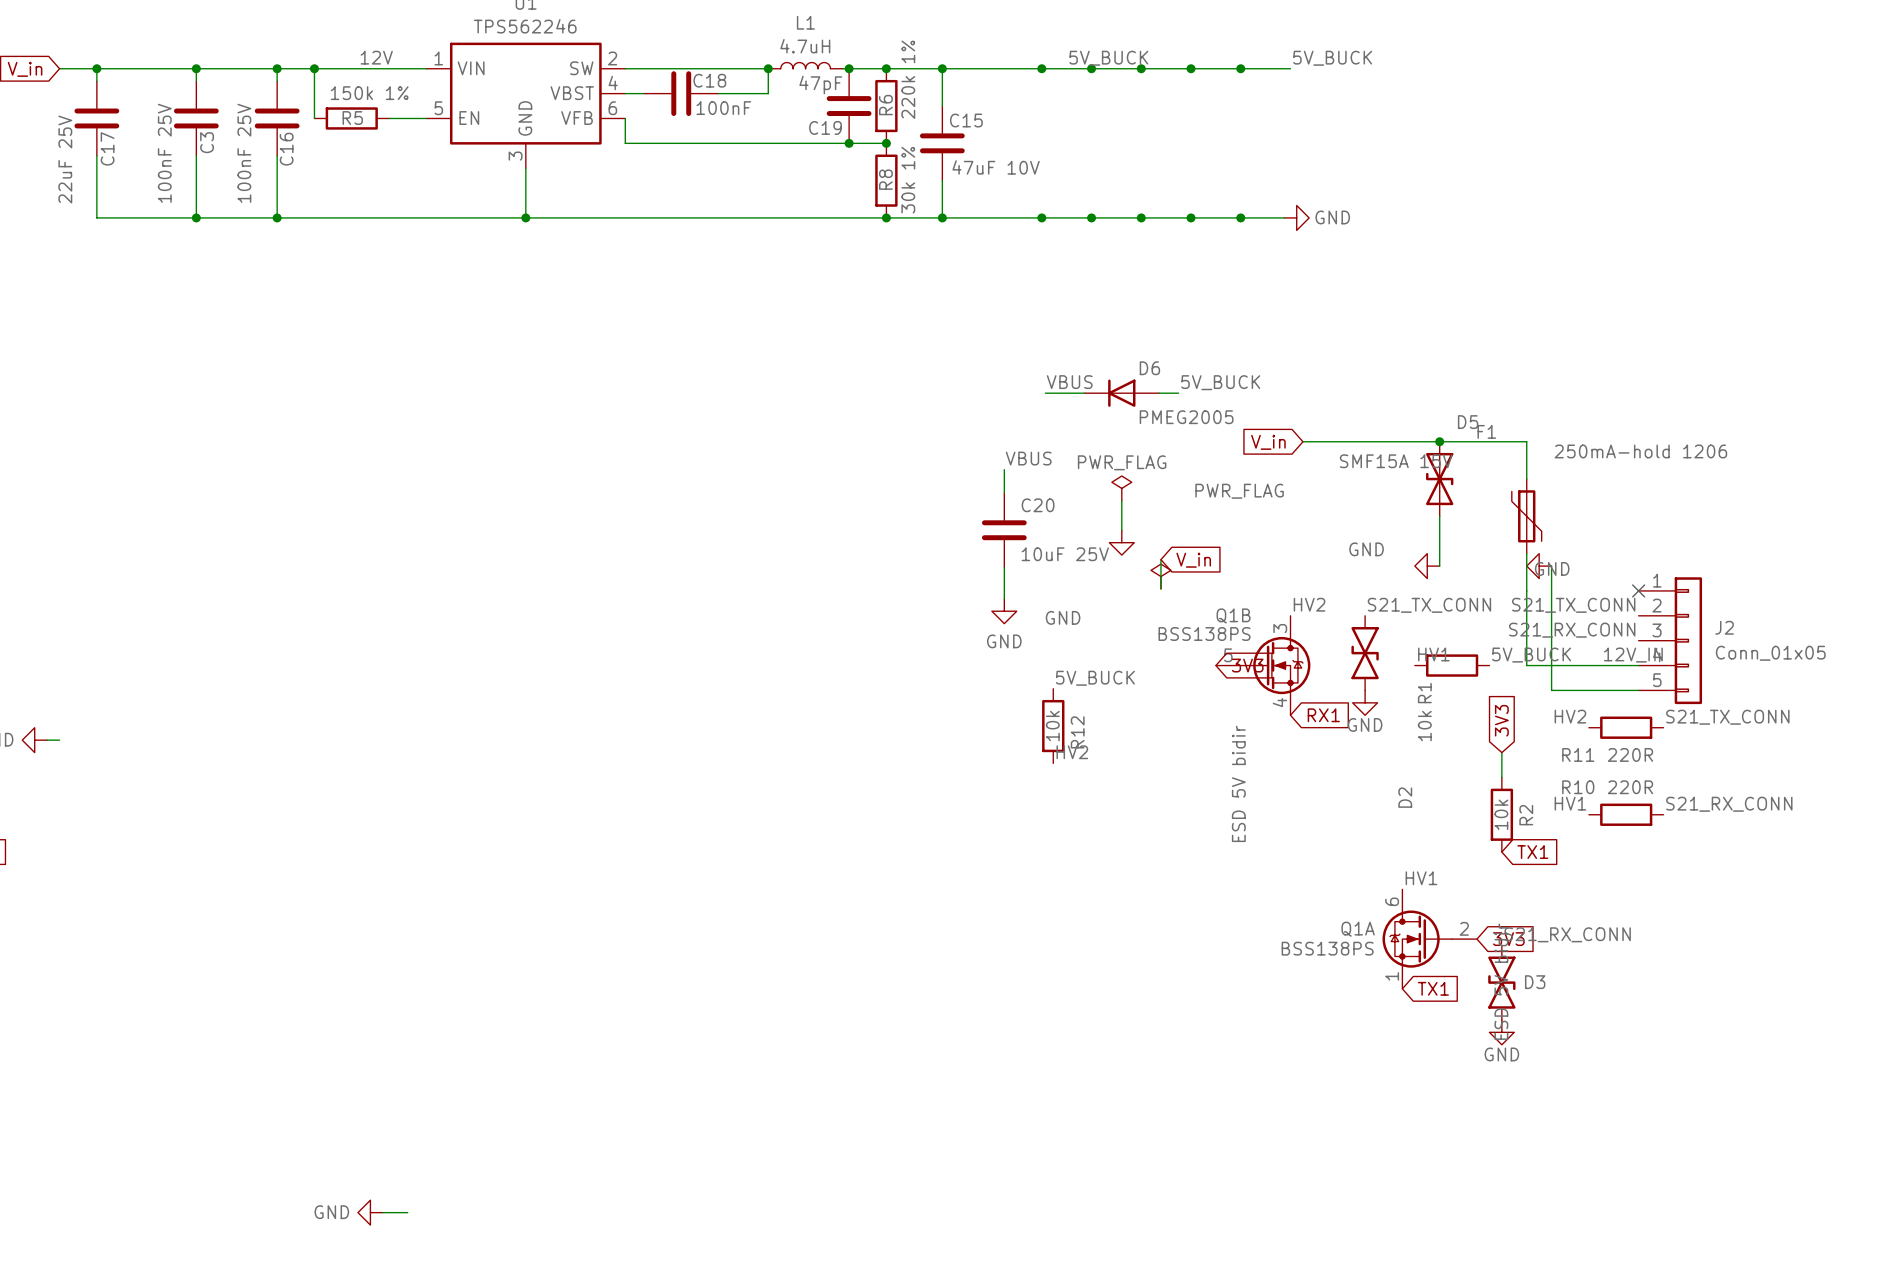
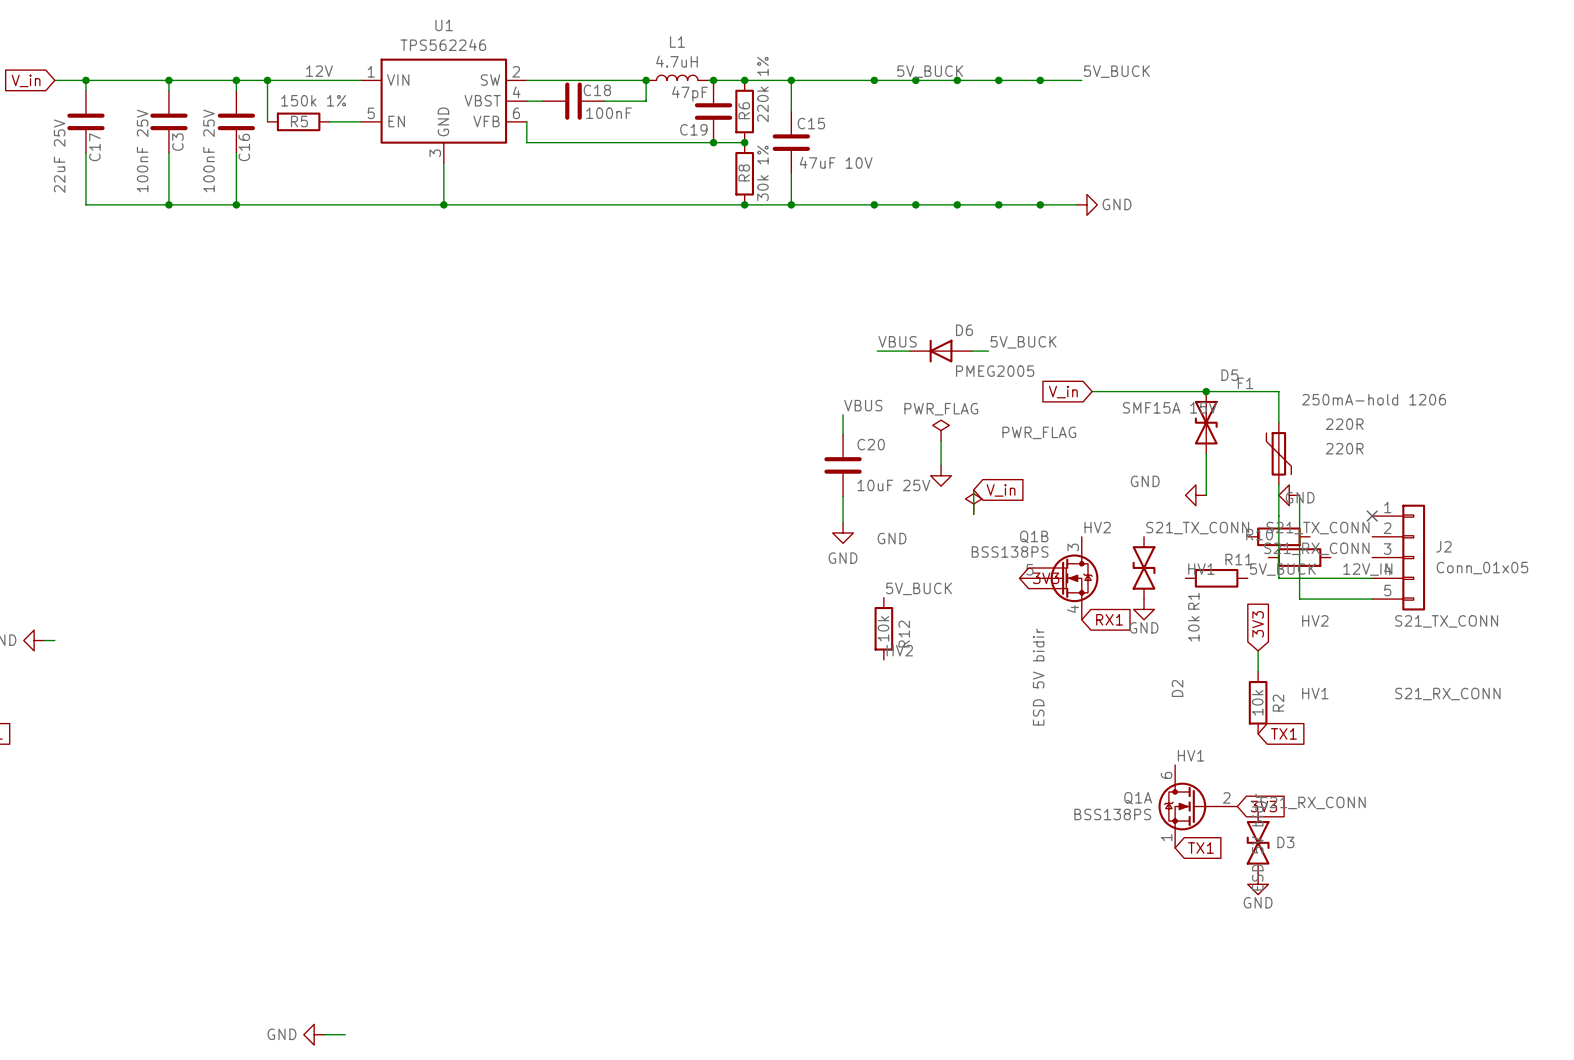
R11 position: (1626, 727) -> (1278, 536)
R11 value position: 220R (1630, 754) -> 220R (1344, 424)
R10 value position: 220R (1630, 787) -> 220R (1344, 448)
R10 position: (1626, 814) -> (1299, 557)

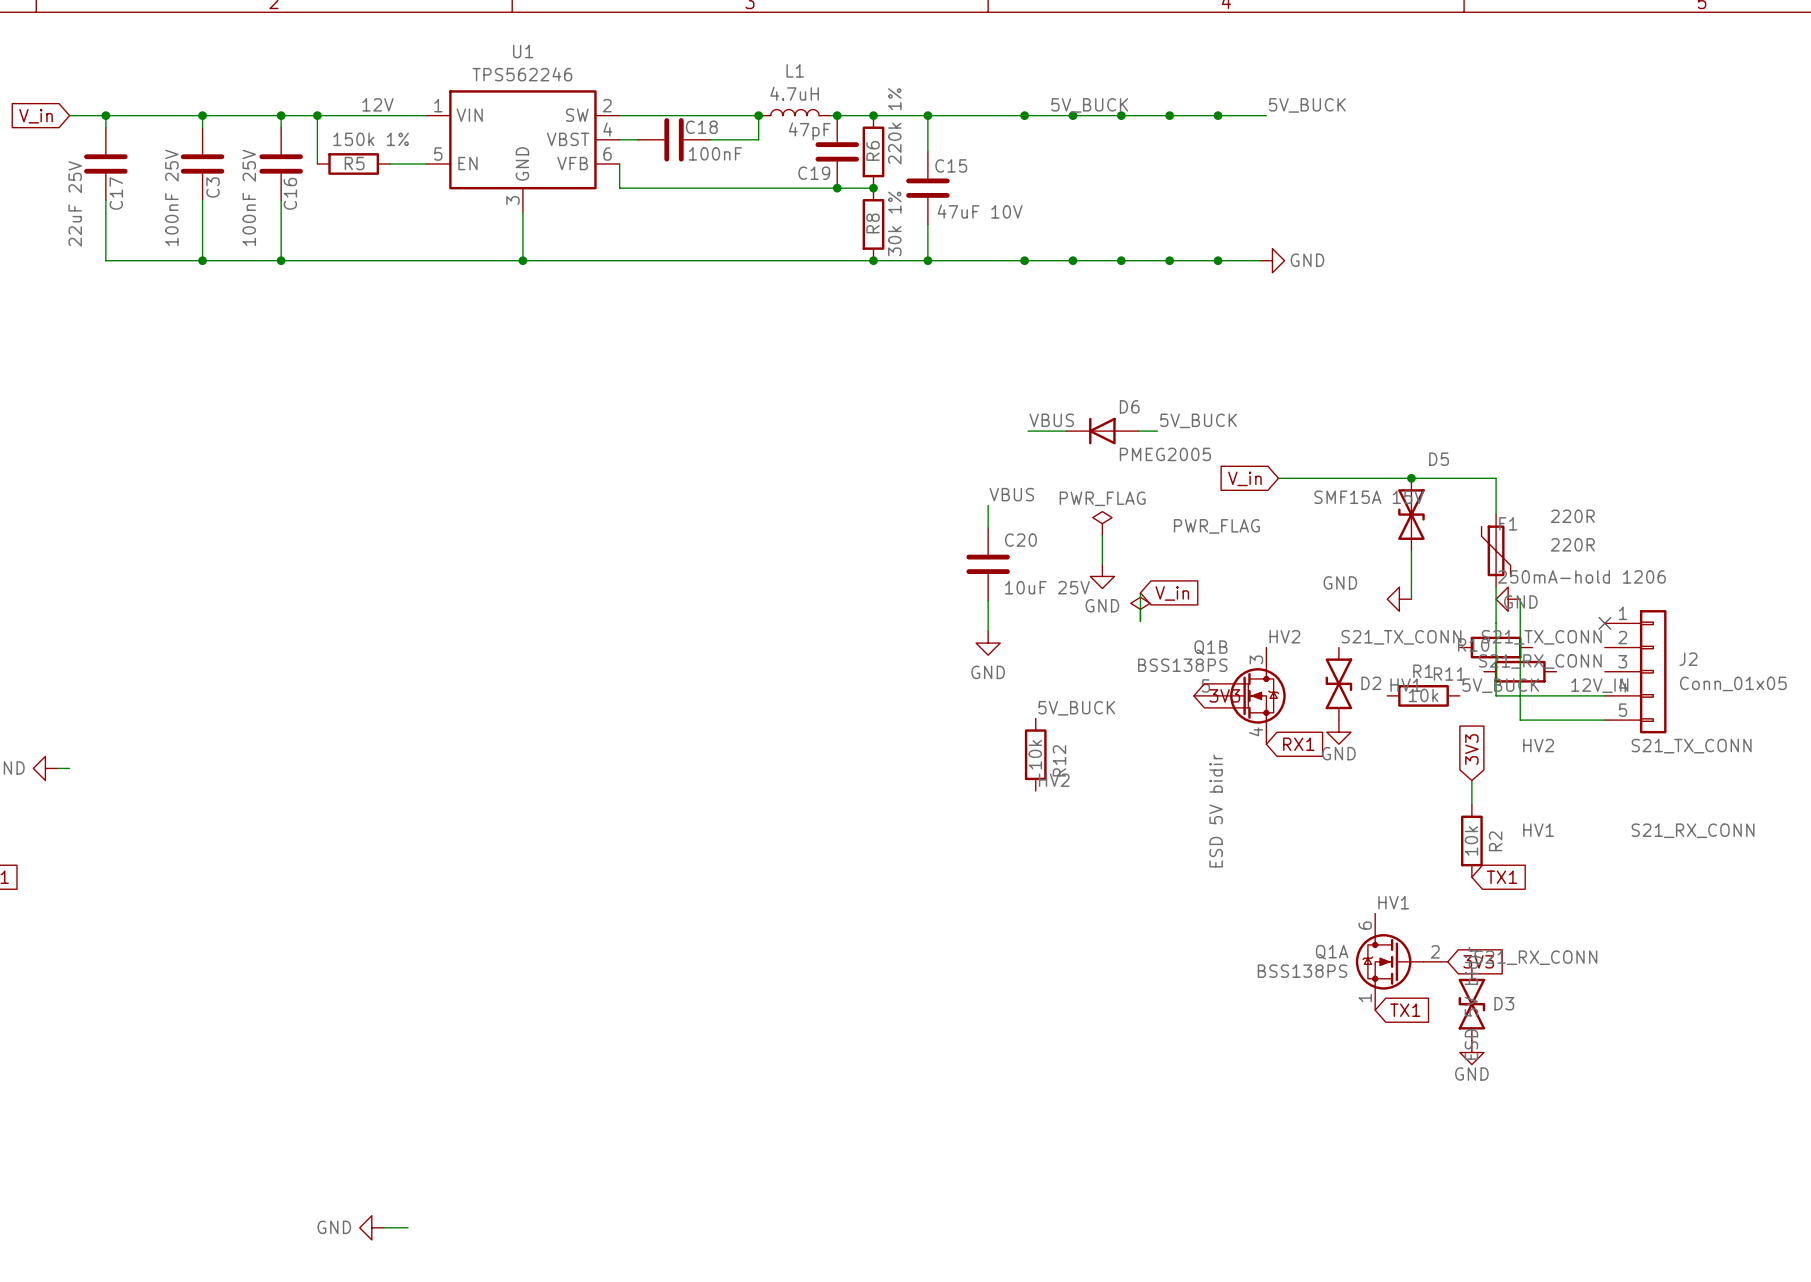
F1 name position: F1 (1245, 383) -> F1 (1508, 523)
F1 value position: 250mA-hold 1206 (1374, 399) -> 250mA-hold 1206 (1581, 576)
power symbol text position: GND (892, 538) -> GND (1102, 605)
R1 name rotation: 0° (1193, 601) -> 90° clockwise (1423, 671)
R1 name position: R1 (1193, 601) -> R1 (1423, 671)
R1 value rotation: 0° (1193, 628) -> 90° clockwise (1423, 695)
R1 value position: 10k (1193, 628) -> 10k (1423, 695)
D2 name rotation: 0° (1177, 688) -> 90° clockwise (1371, 683)
D2 name position: D2 (1177, 688) -> D2 (1371, 683)

